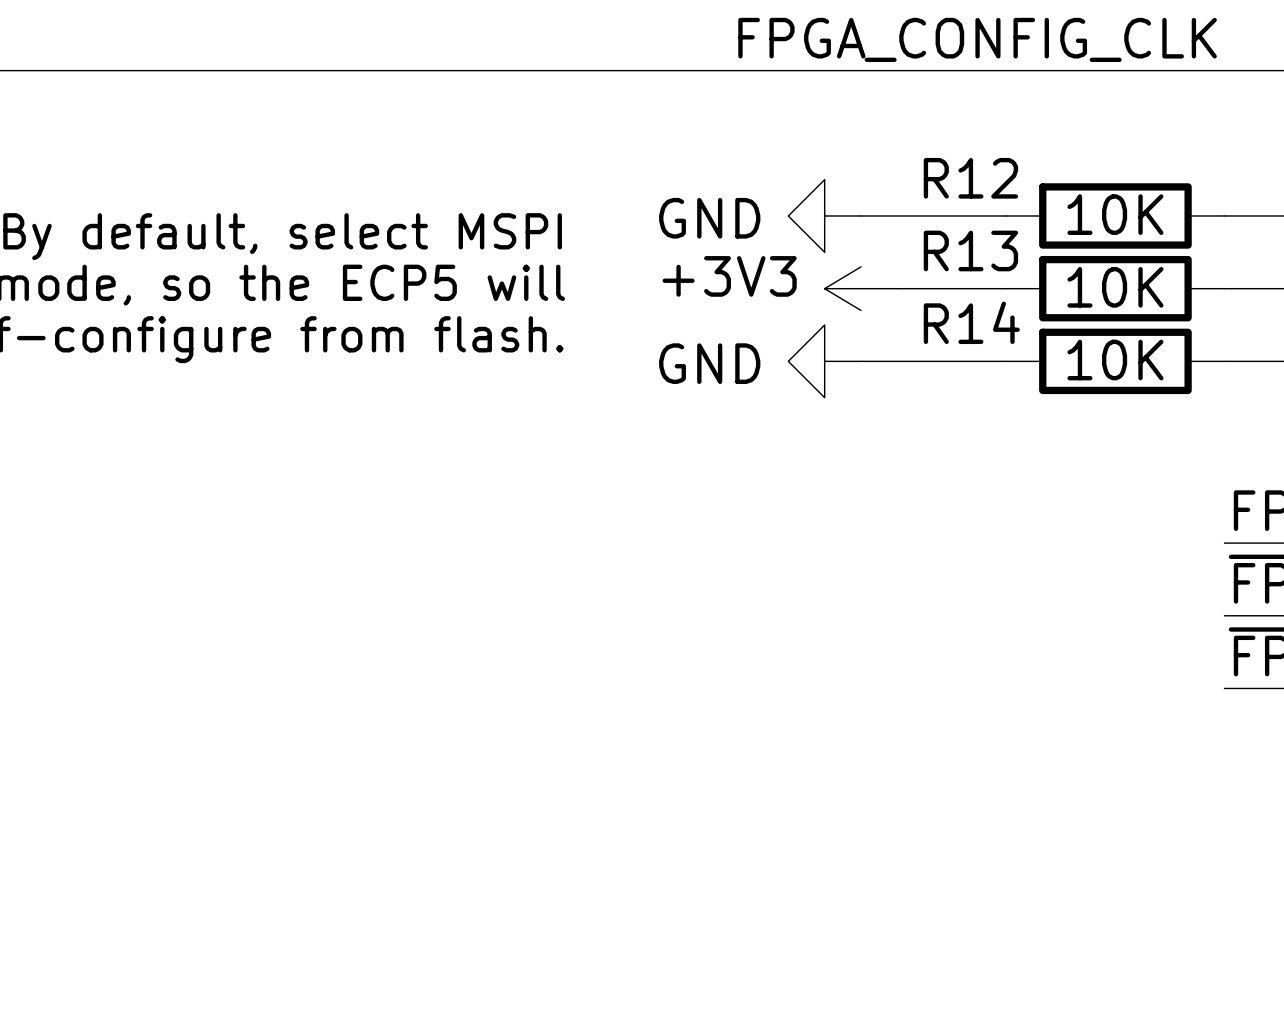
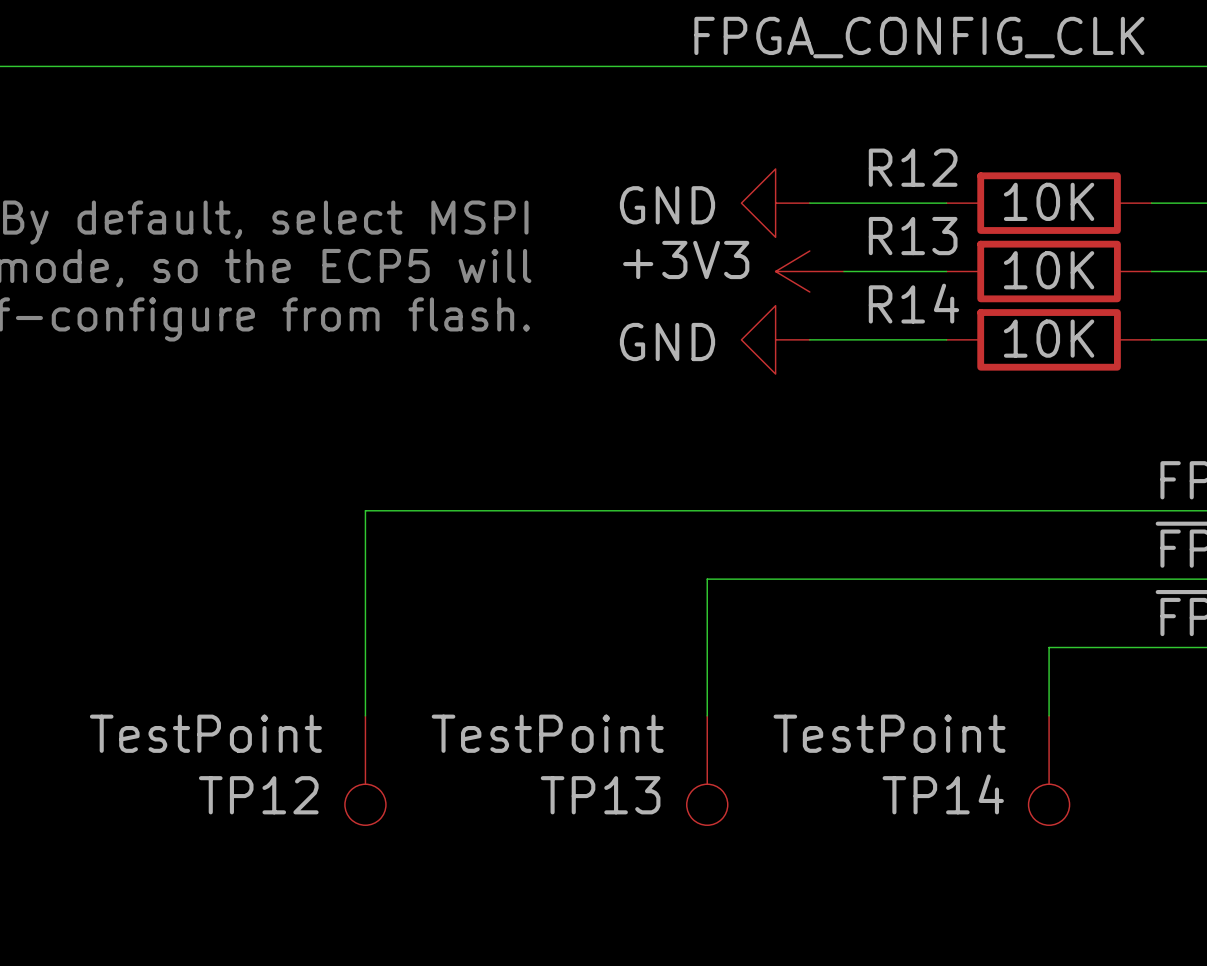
wire: none -> (1151, 510) (365, 510) (365, 715)
wire: none -> (1151, 579) (707, 579) (707, 715)
wire: none -> (1151, 647) (1049, 647) (1049, 715)
TP12: none -> TestPoint (365, 770)
TP13: none -> TestPoint (707, 770)
TP14: none -> TestPoint (1049, 770)

